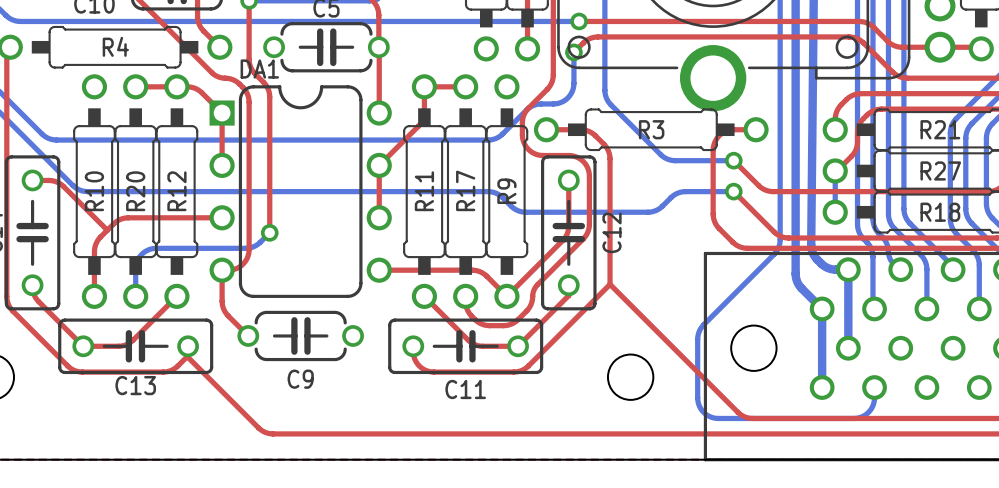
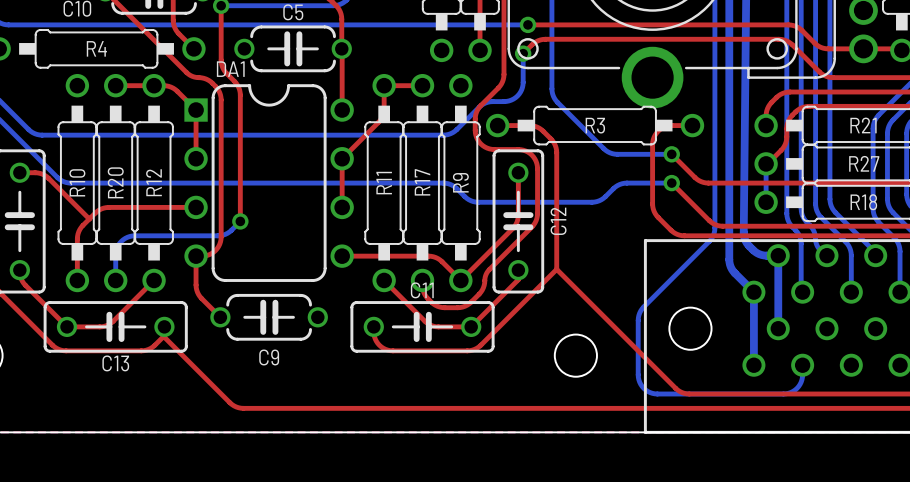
C11 name position: C11 (465, 389) -> C11 (422, 290)

